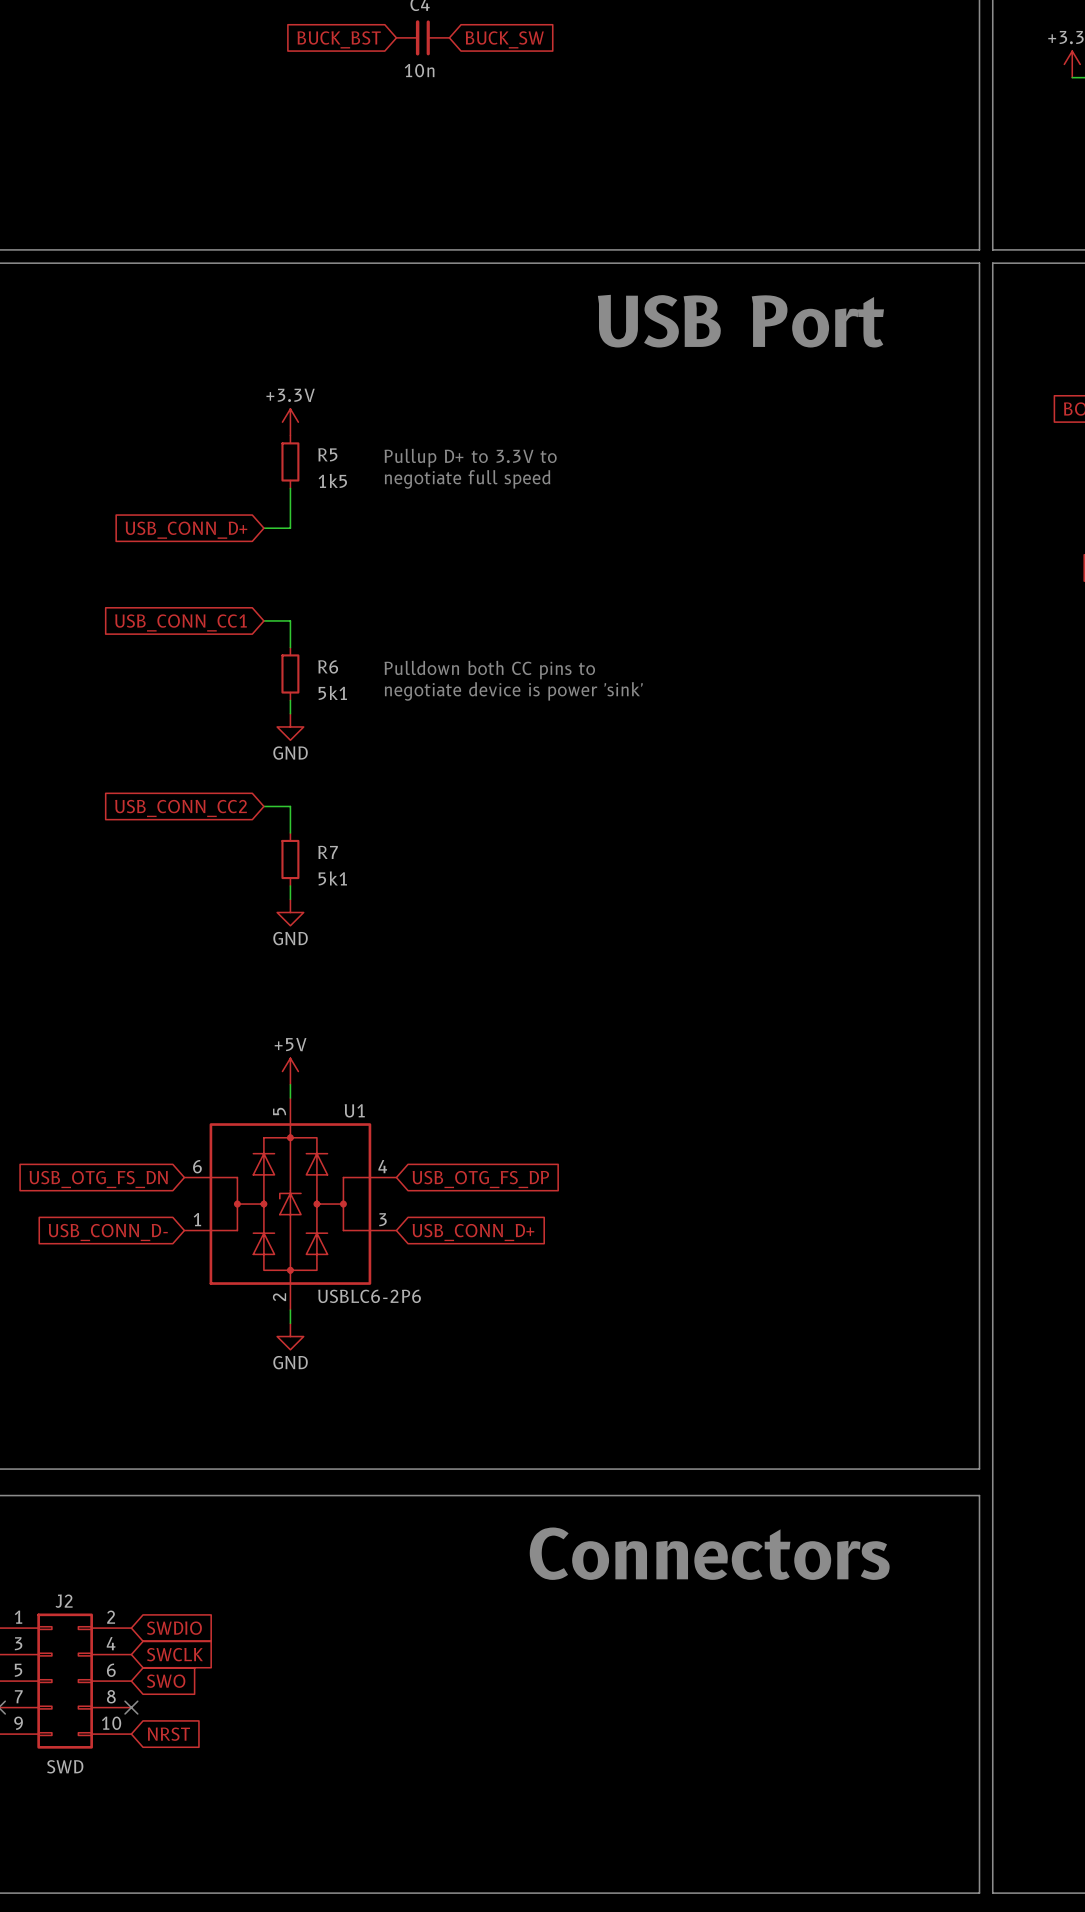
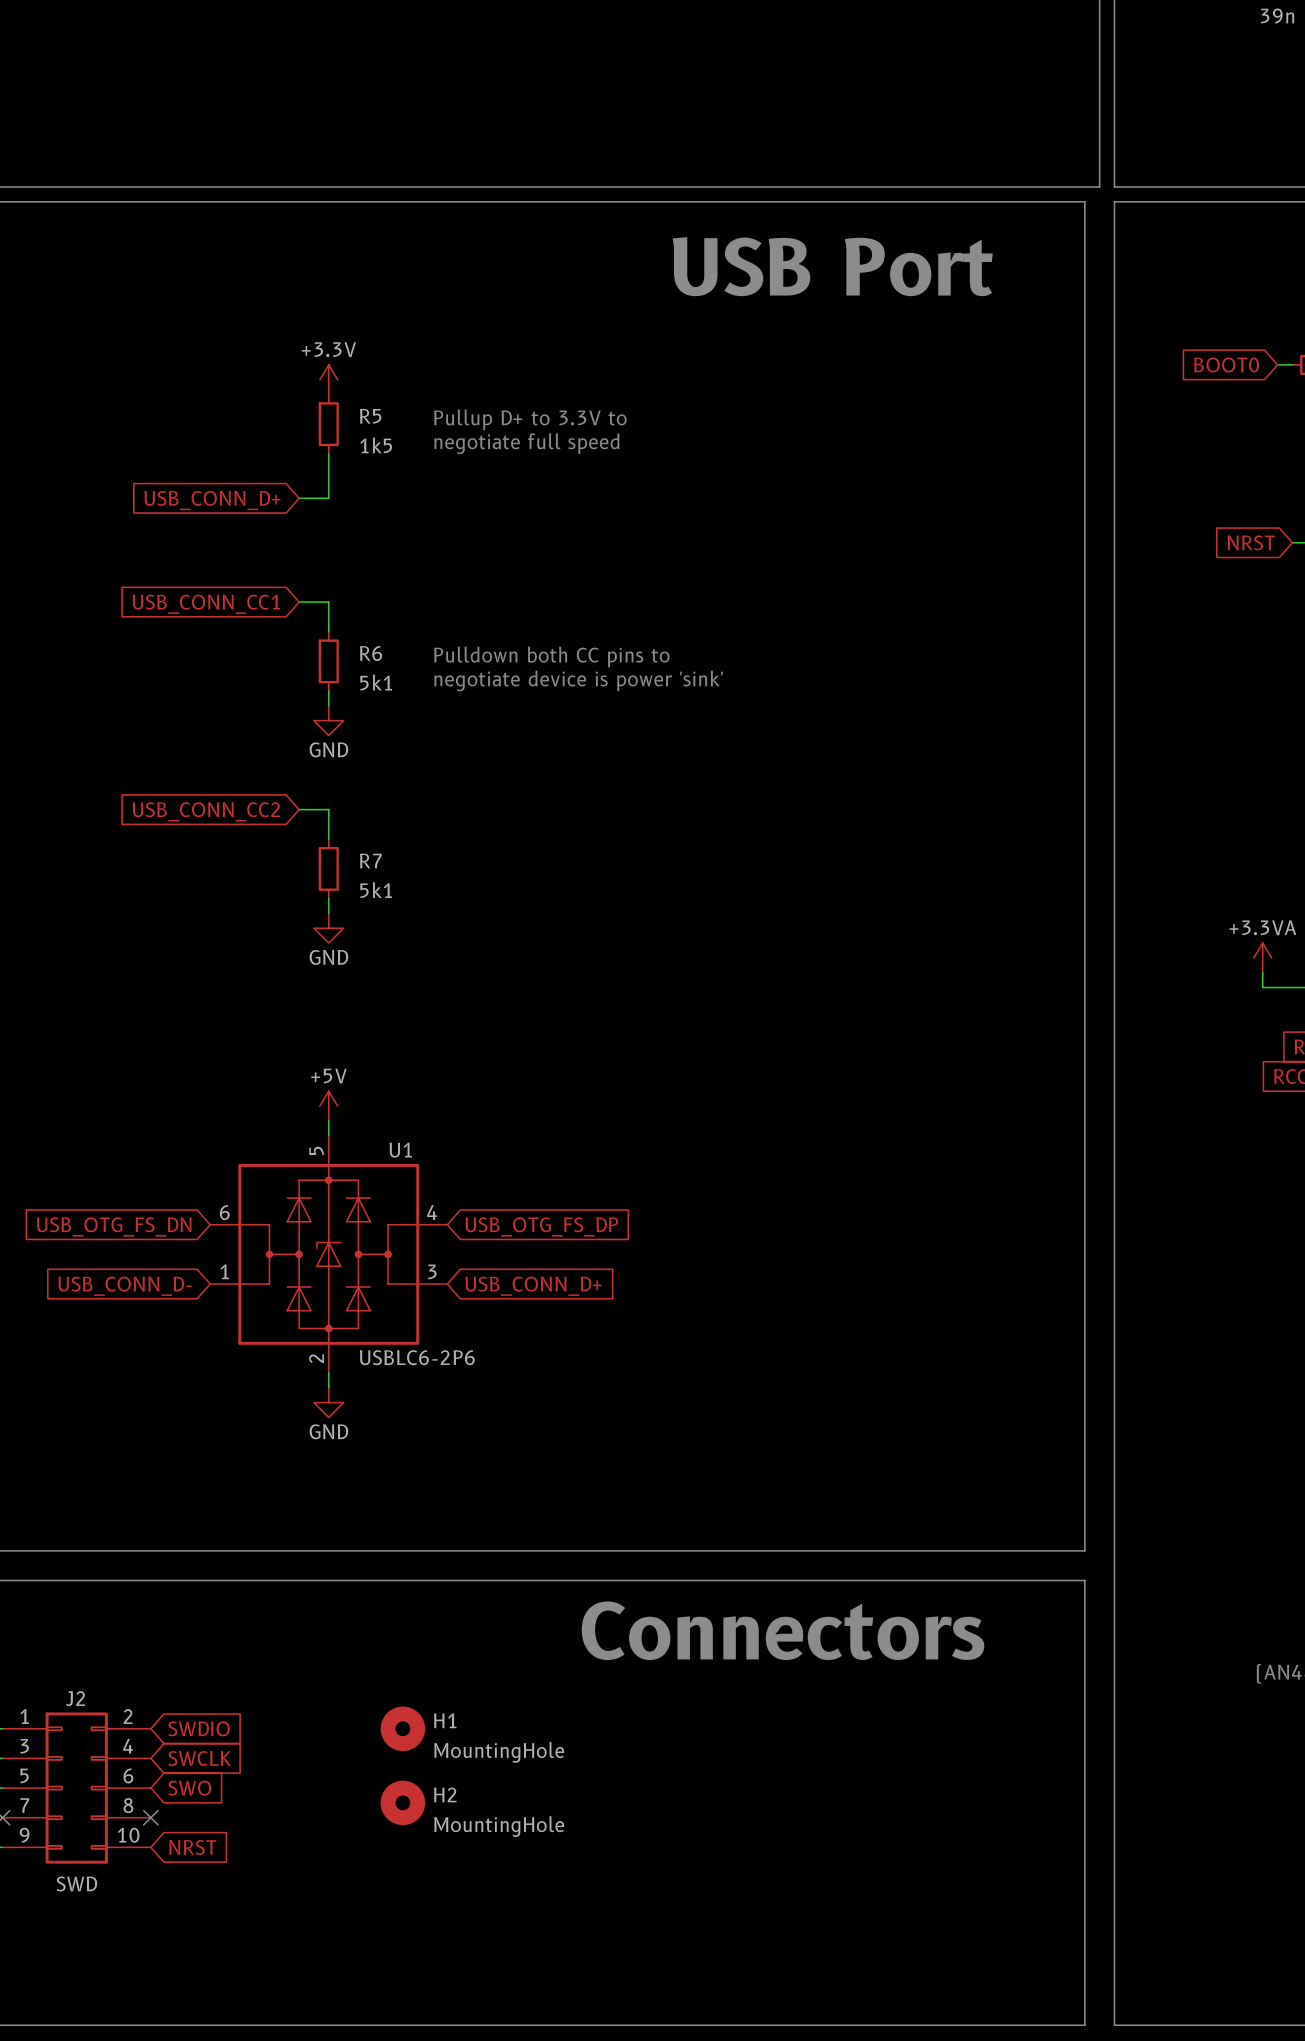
line: (966, 263) (979, 263) (979, 1469) (966, 1469) -> (1084, 201) (1084, 1550)
line: (966, 1495) (979, 1495) (979, 1893) (966, 1893) -> (1084, 1580) (1084, 2025)
text position: Connectors (709, 1553) -> Connectors (783, 1630)
H1: none -> MountingHole (402, 1728)
H2: none -> MountingHole (402, 1802)

